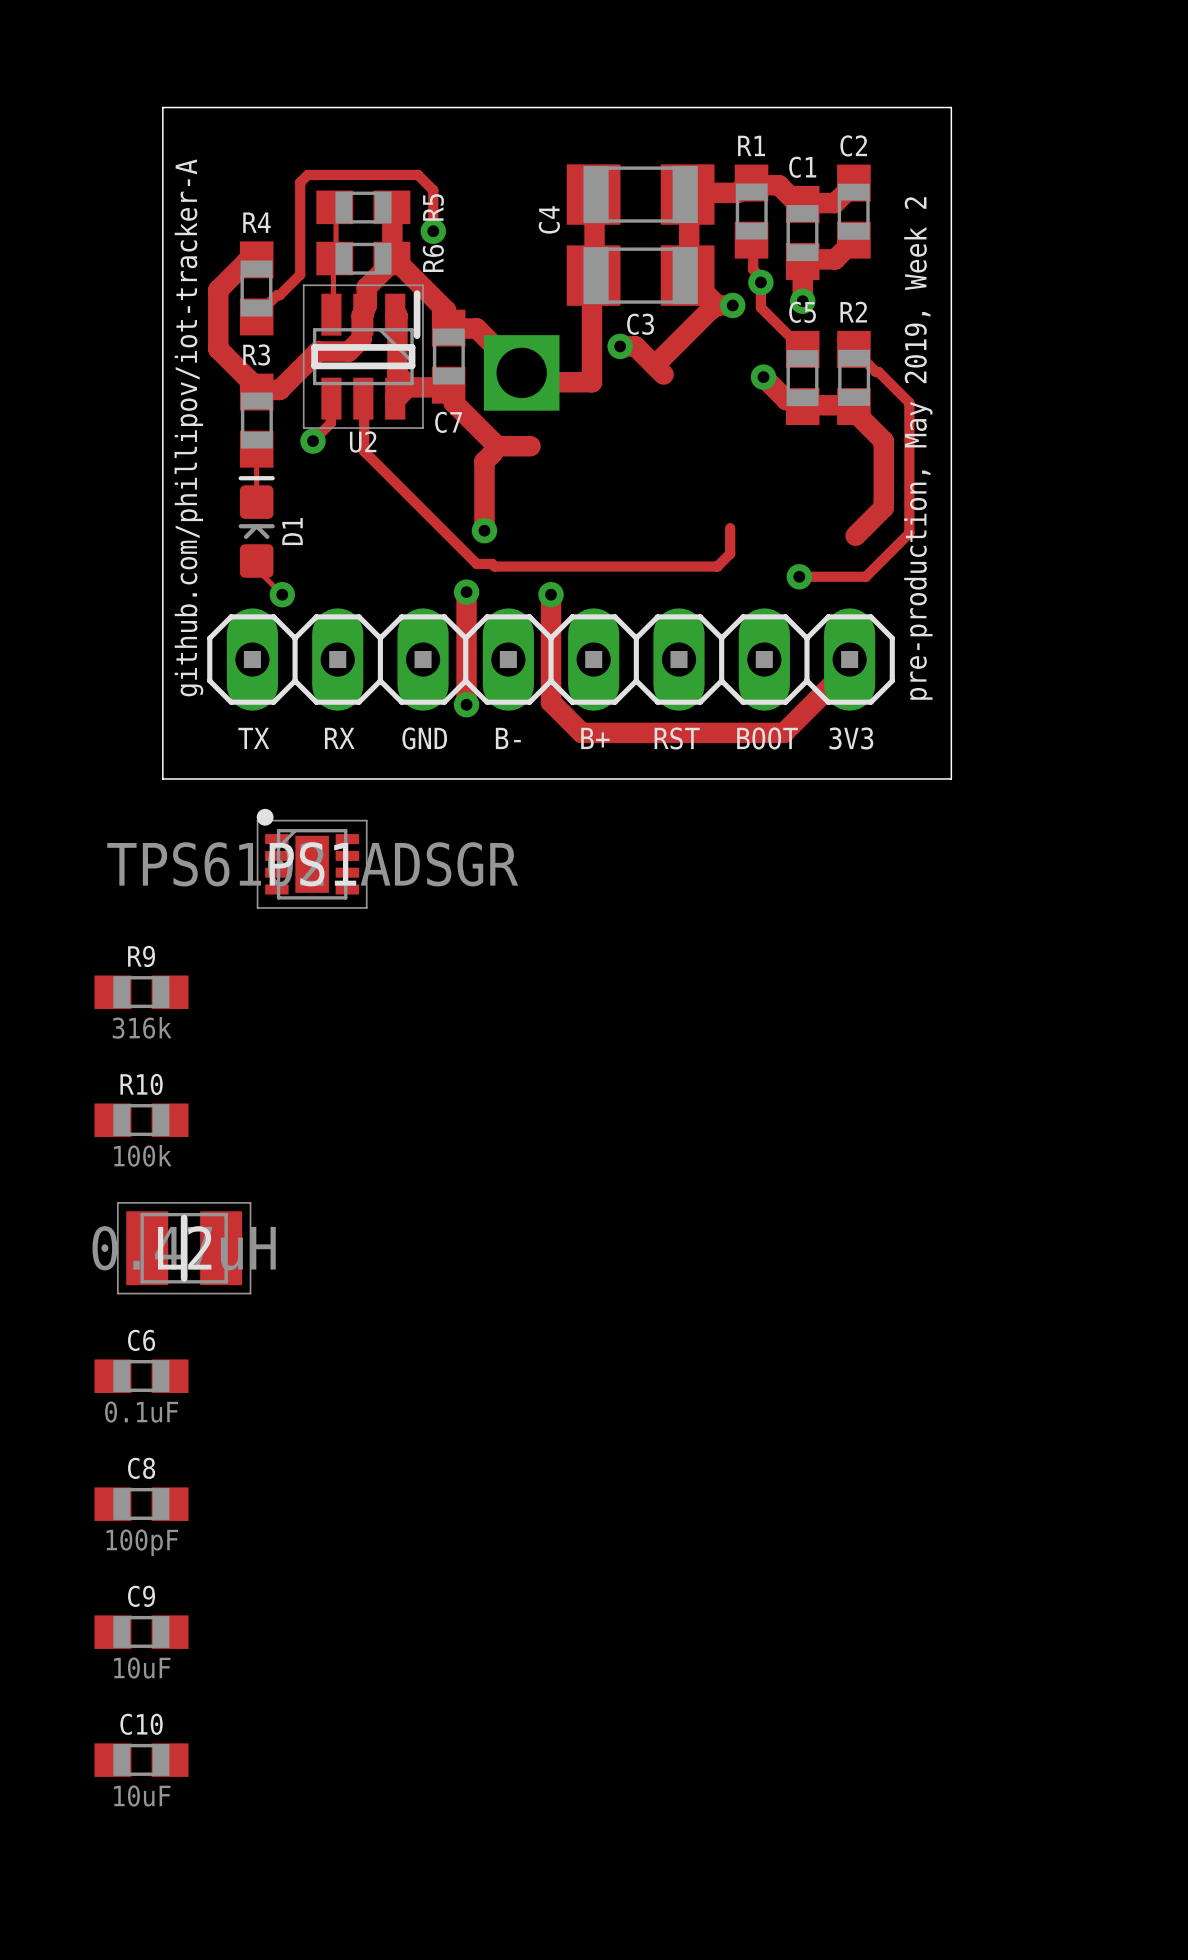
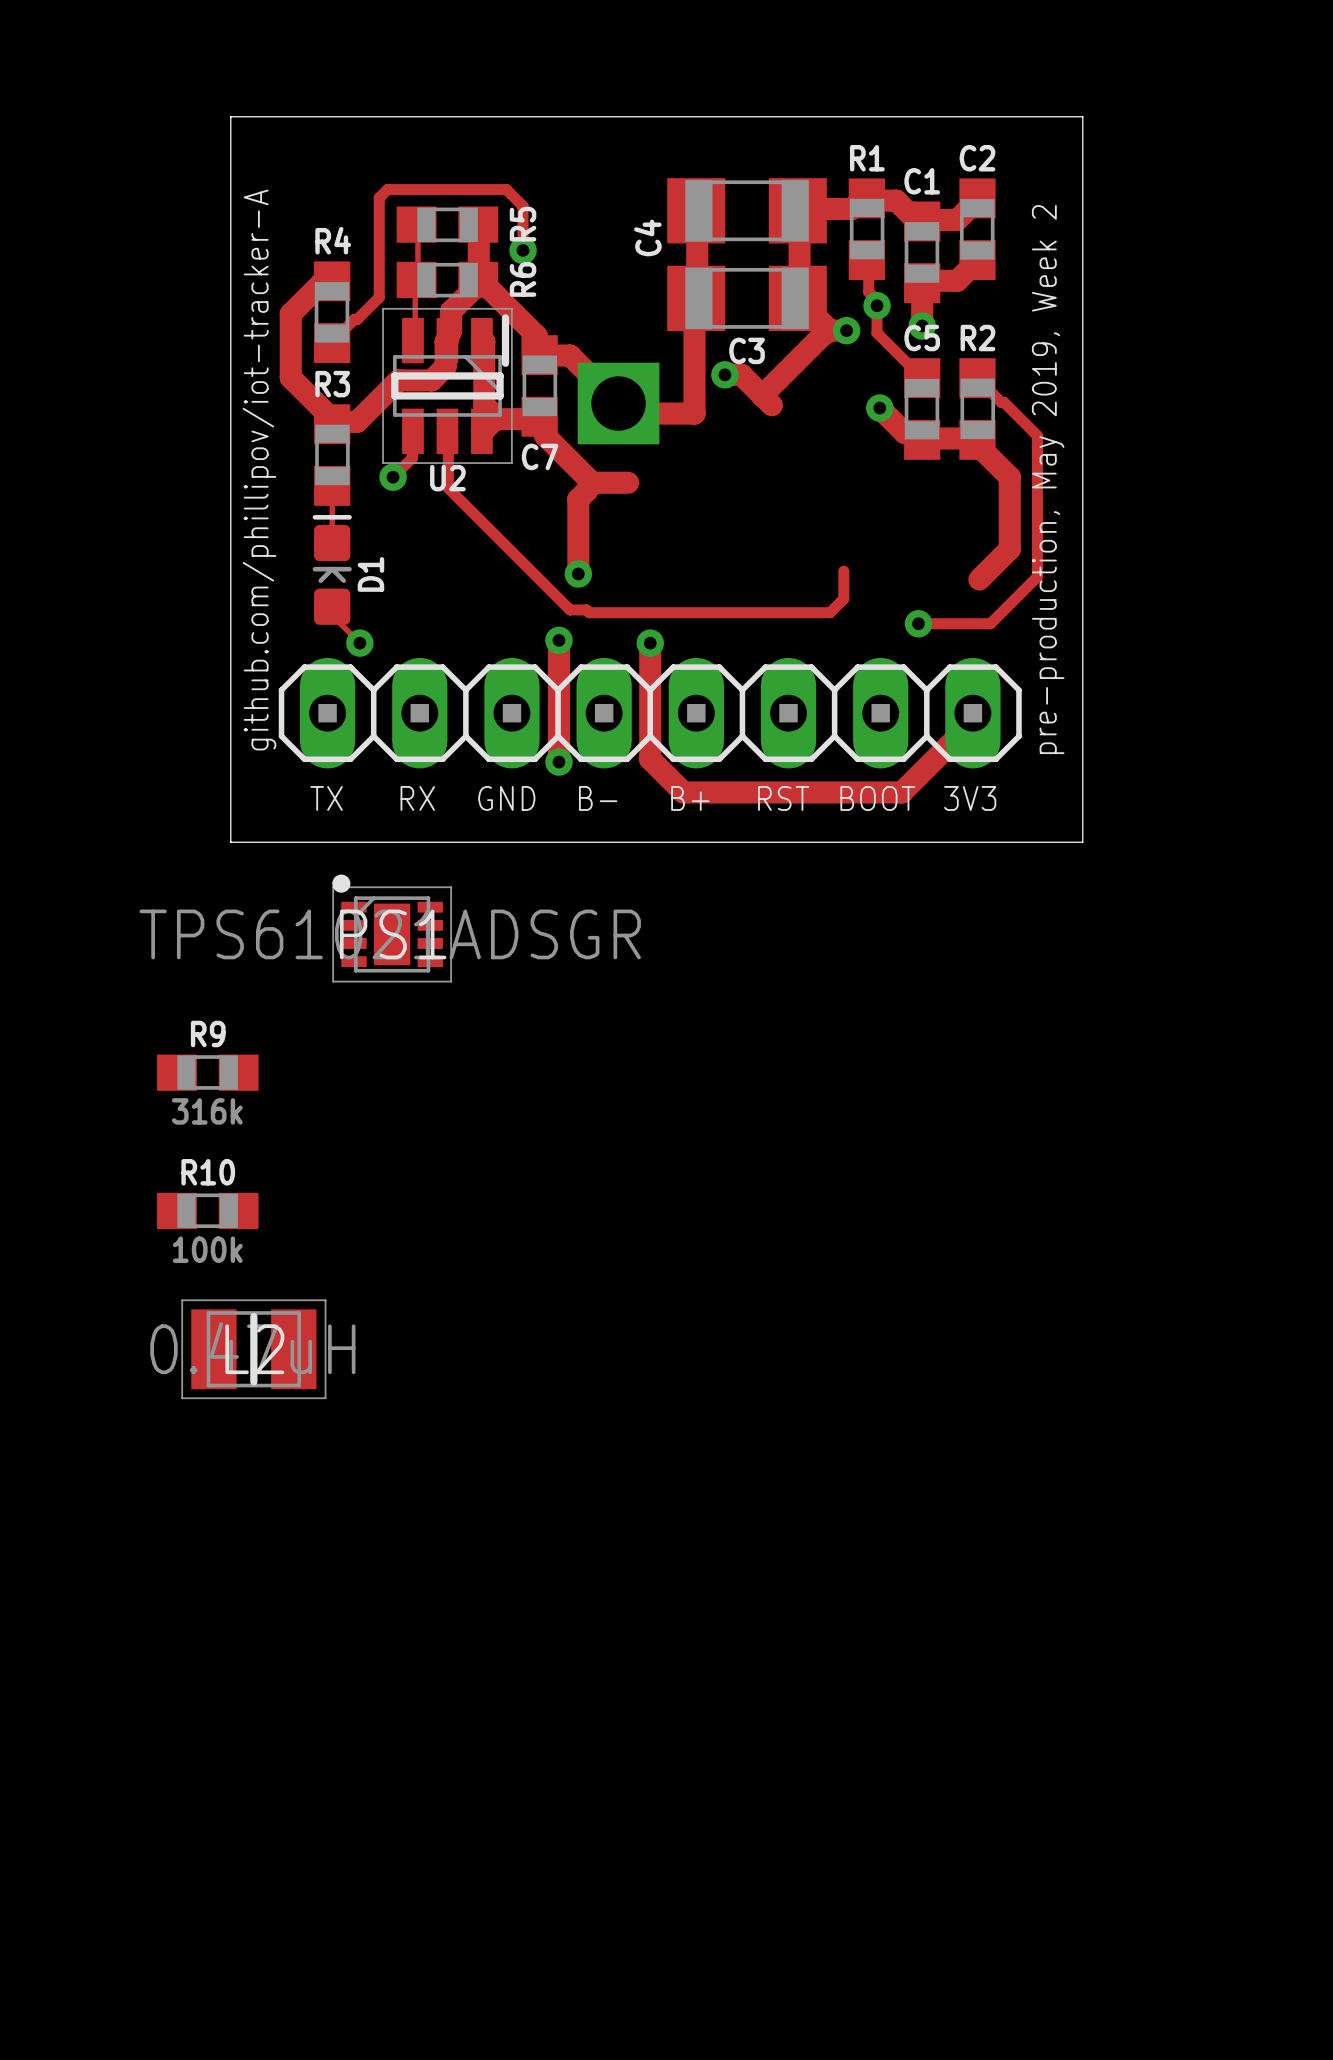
C6: 0.1uF (141, 1376) -> none
C8: 100pF (141, 1504) -> none
C9: 10uF (141, 1632) -> none
C10: 10uF (141, 1760) -> none

